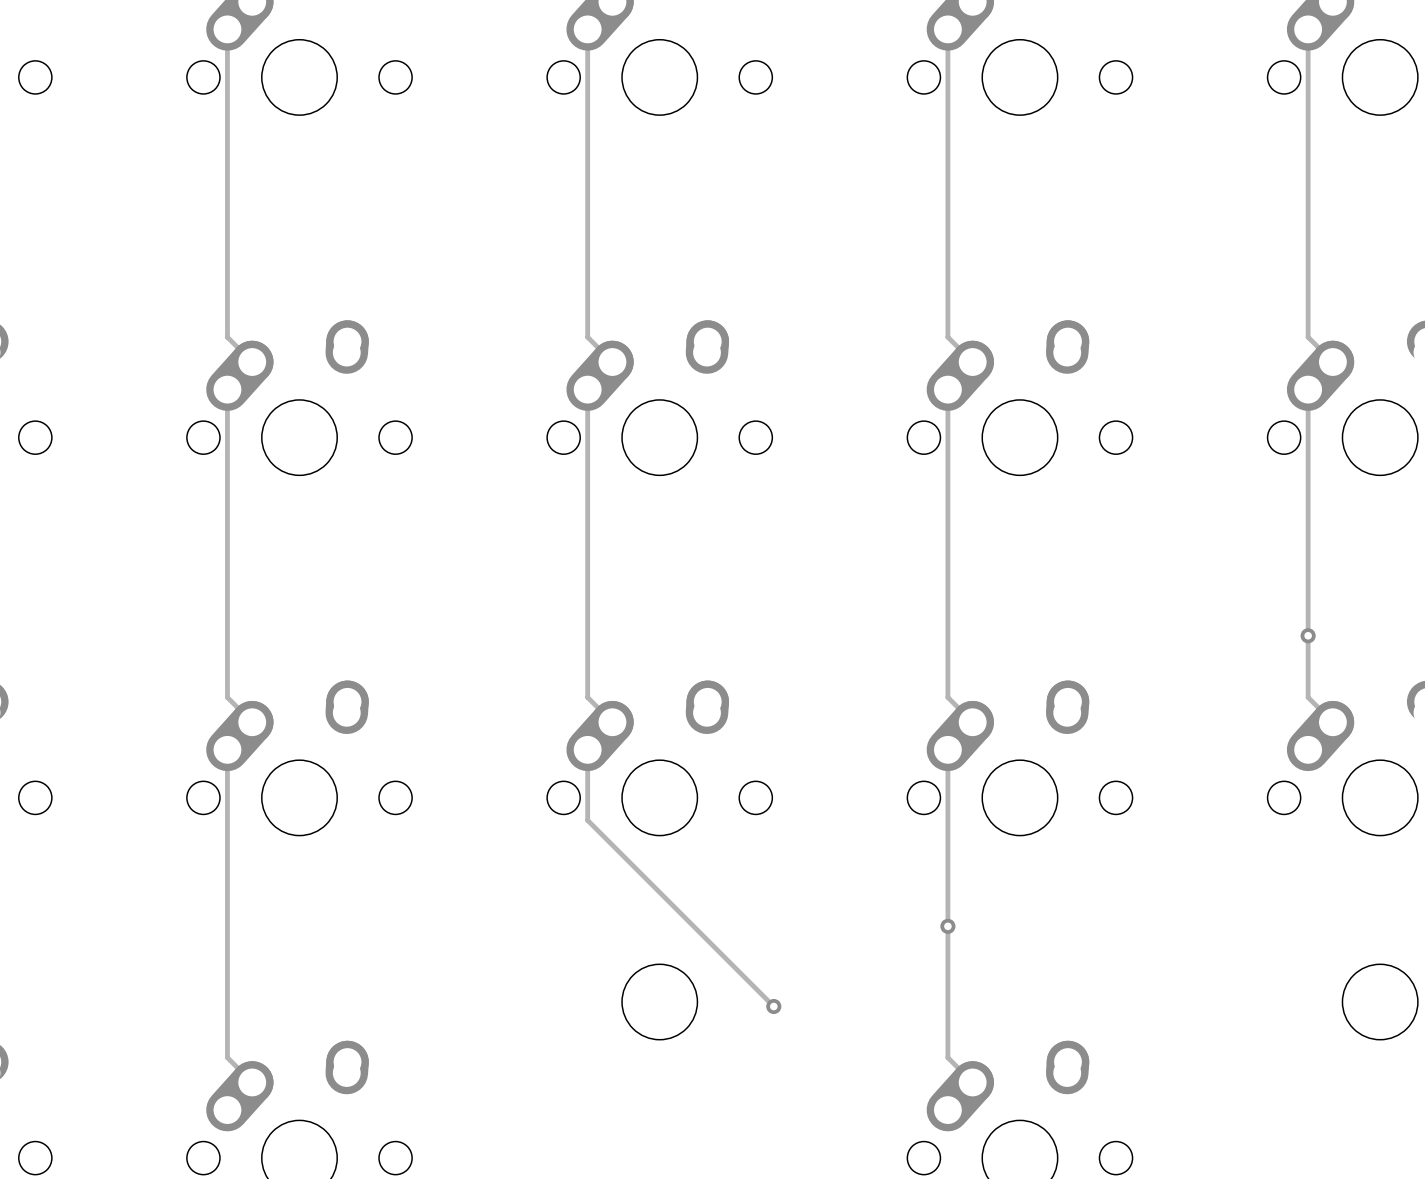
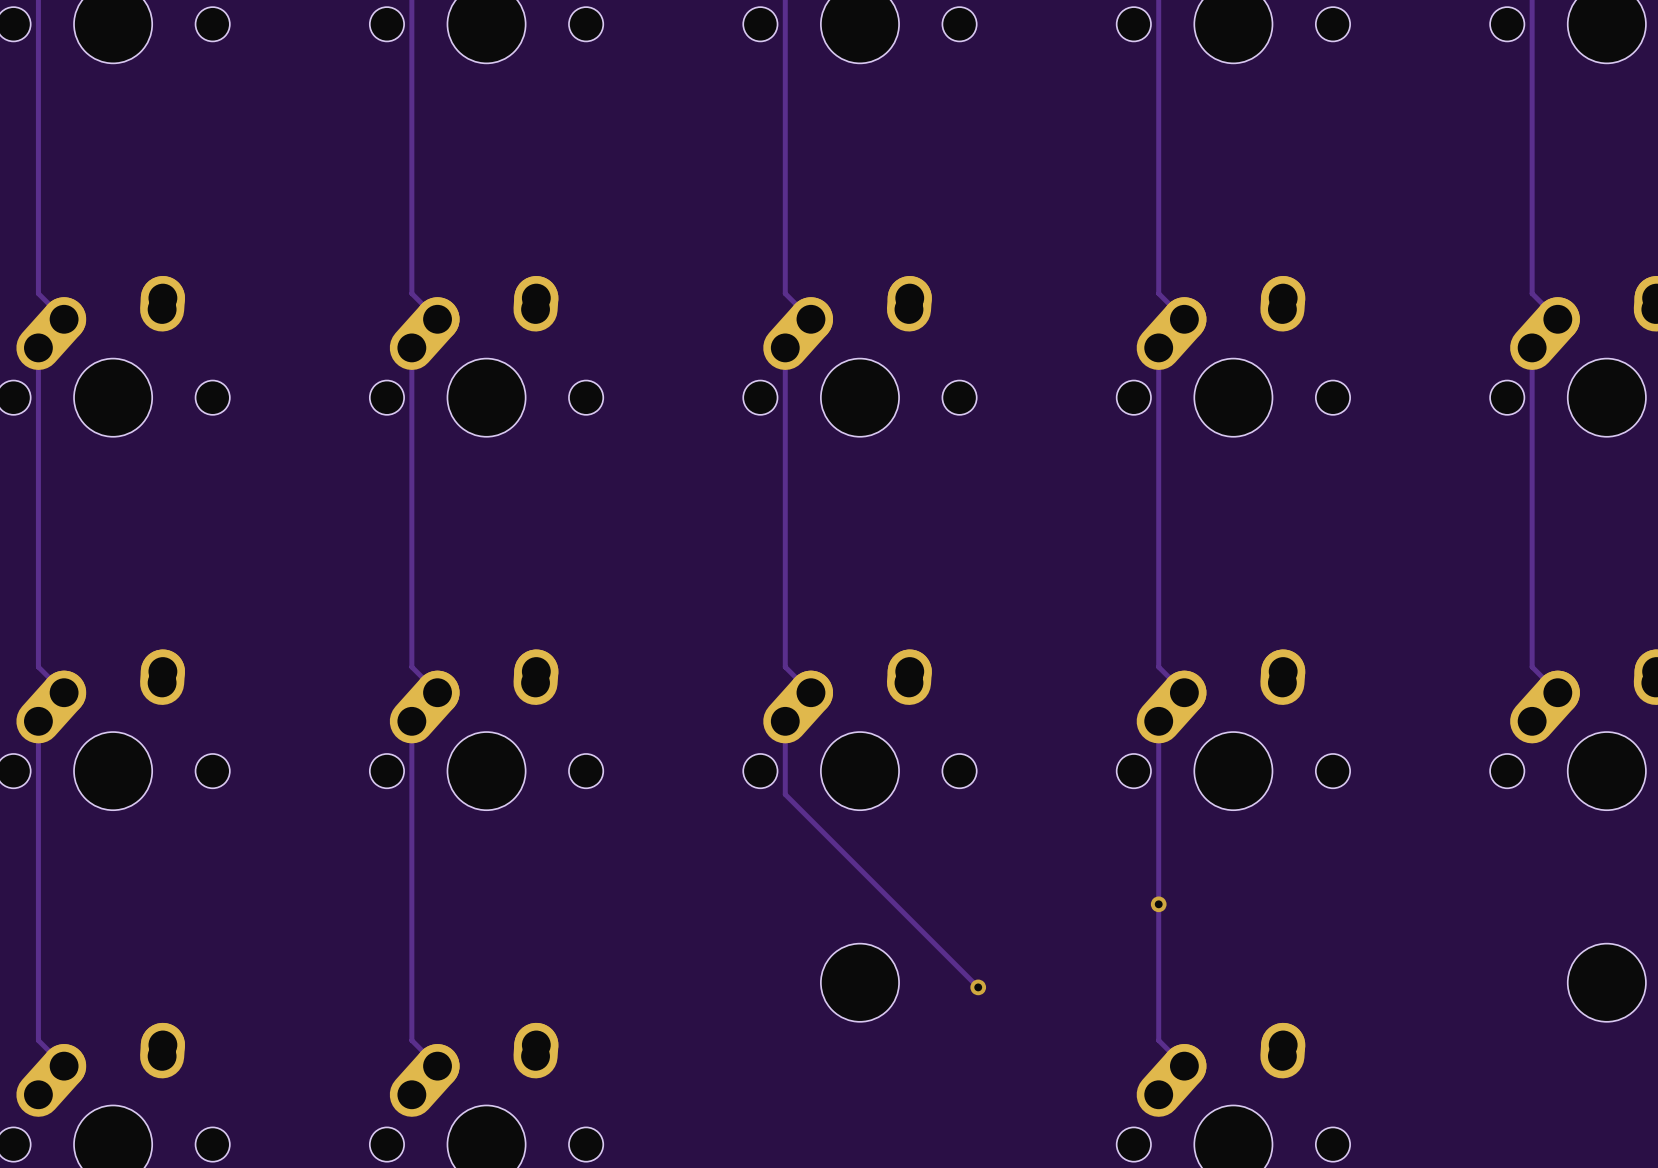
via: (1308, 635) -> none

